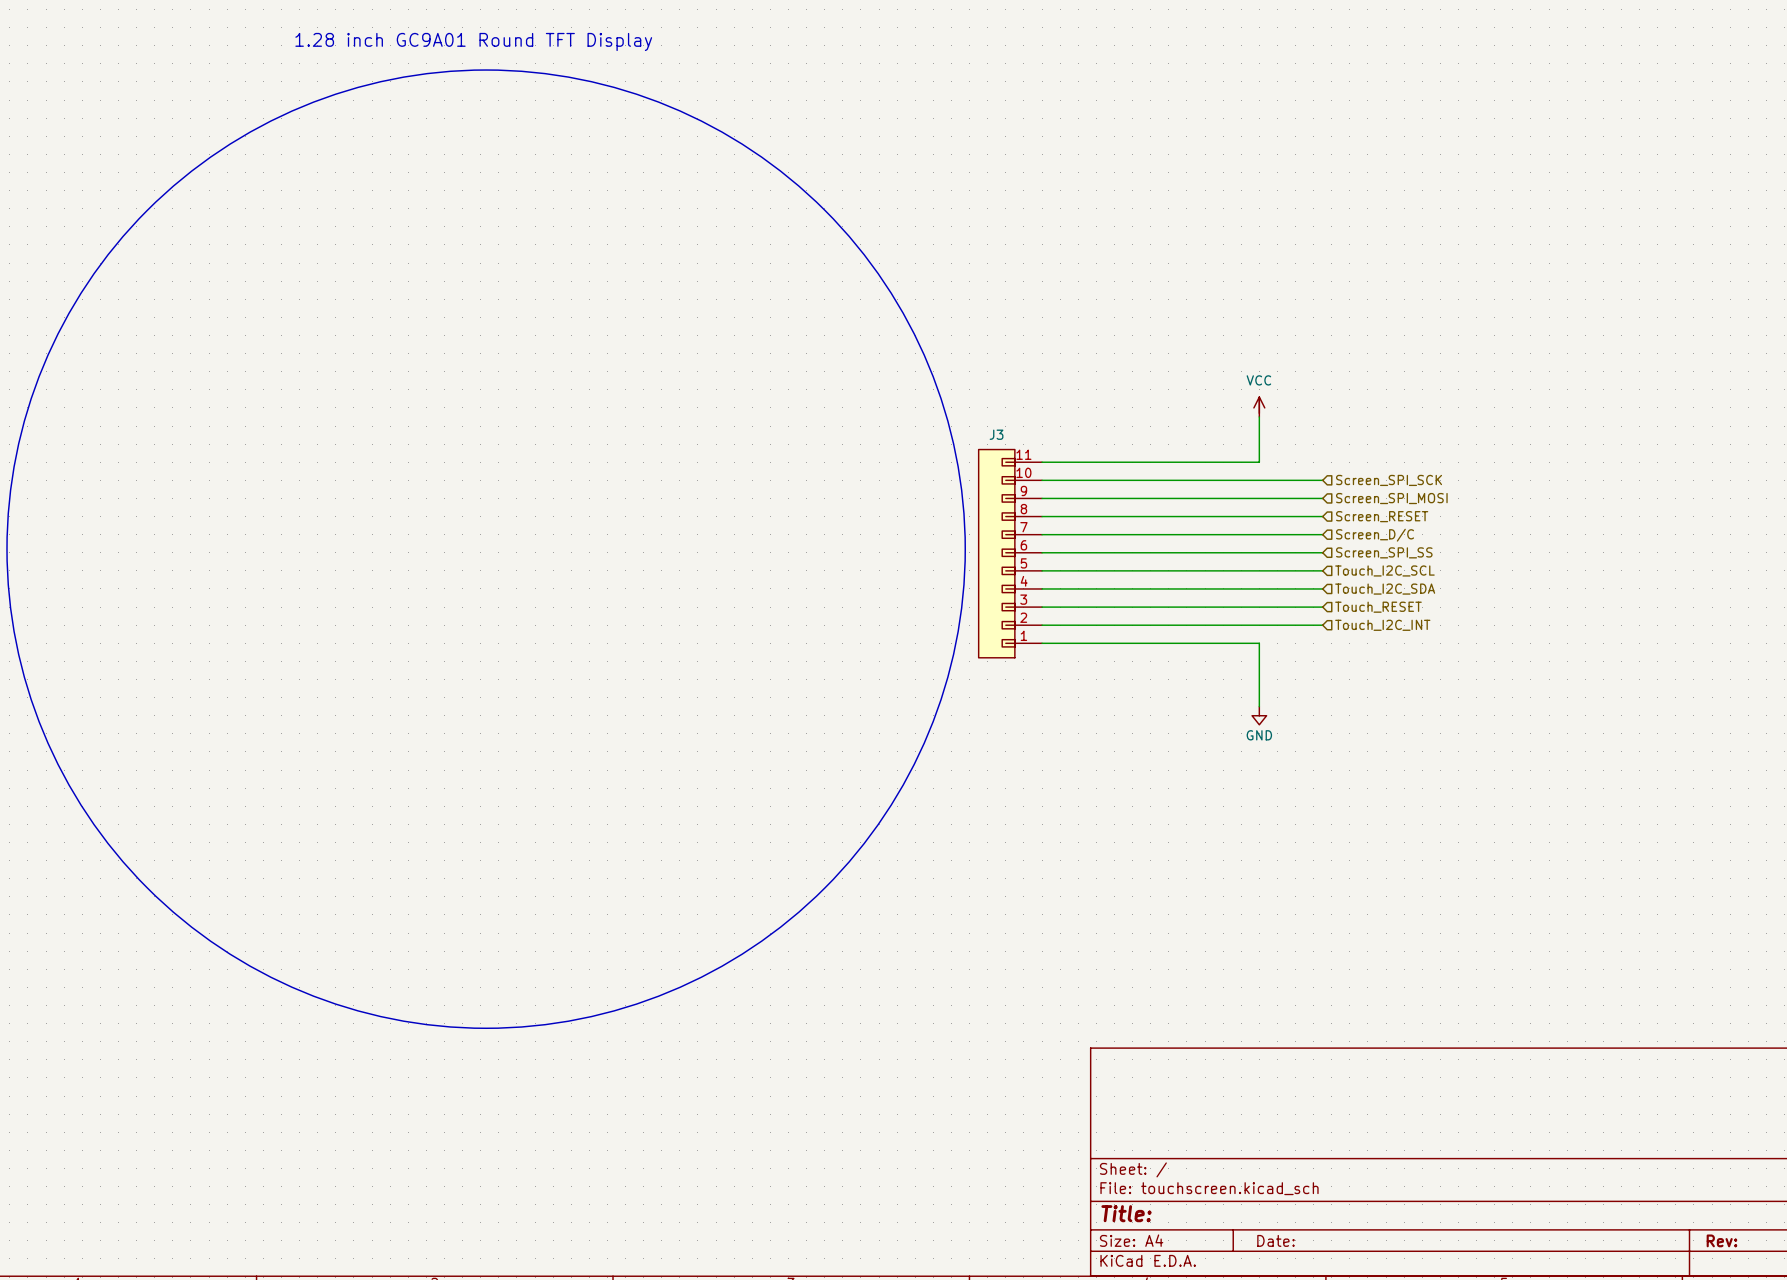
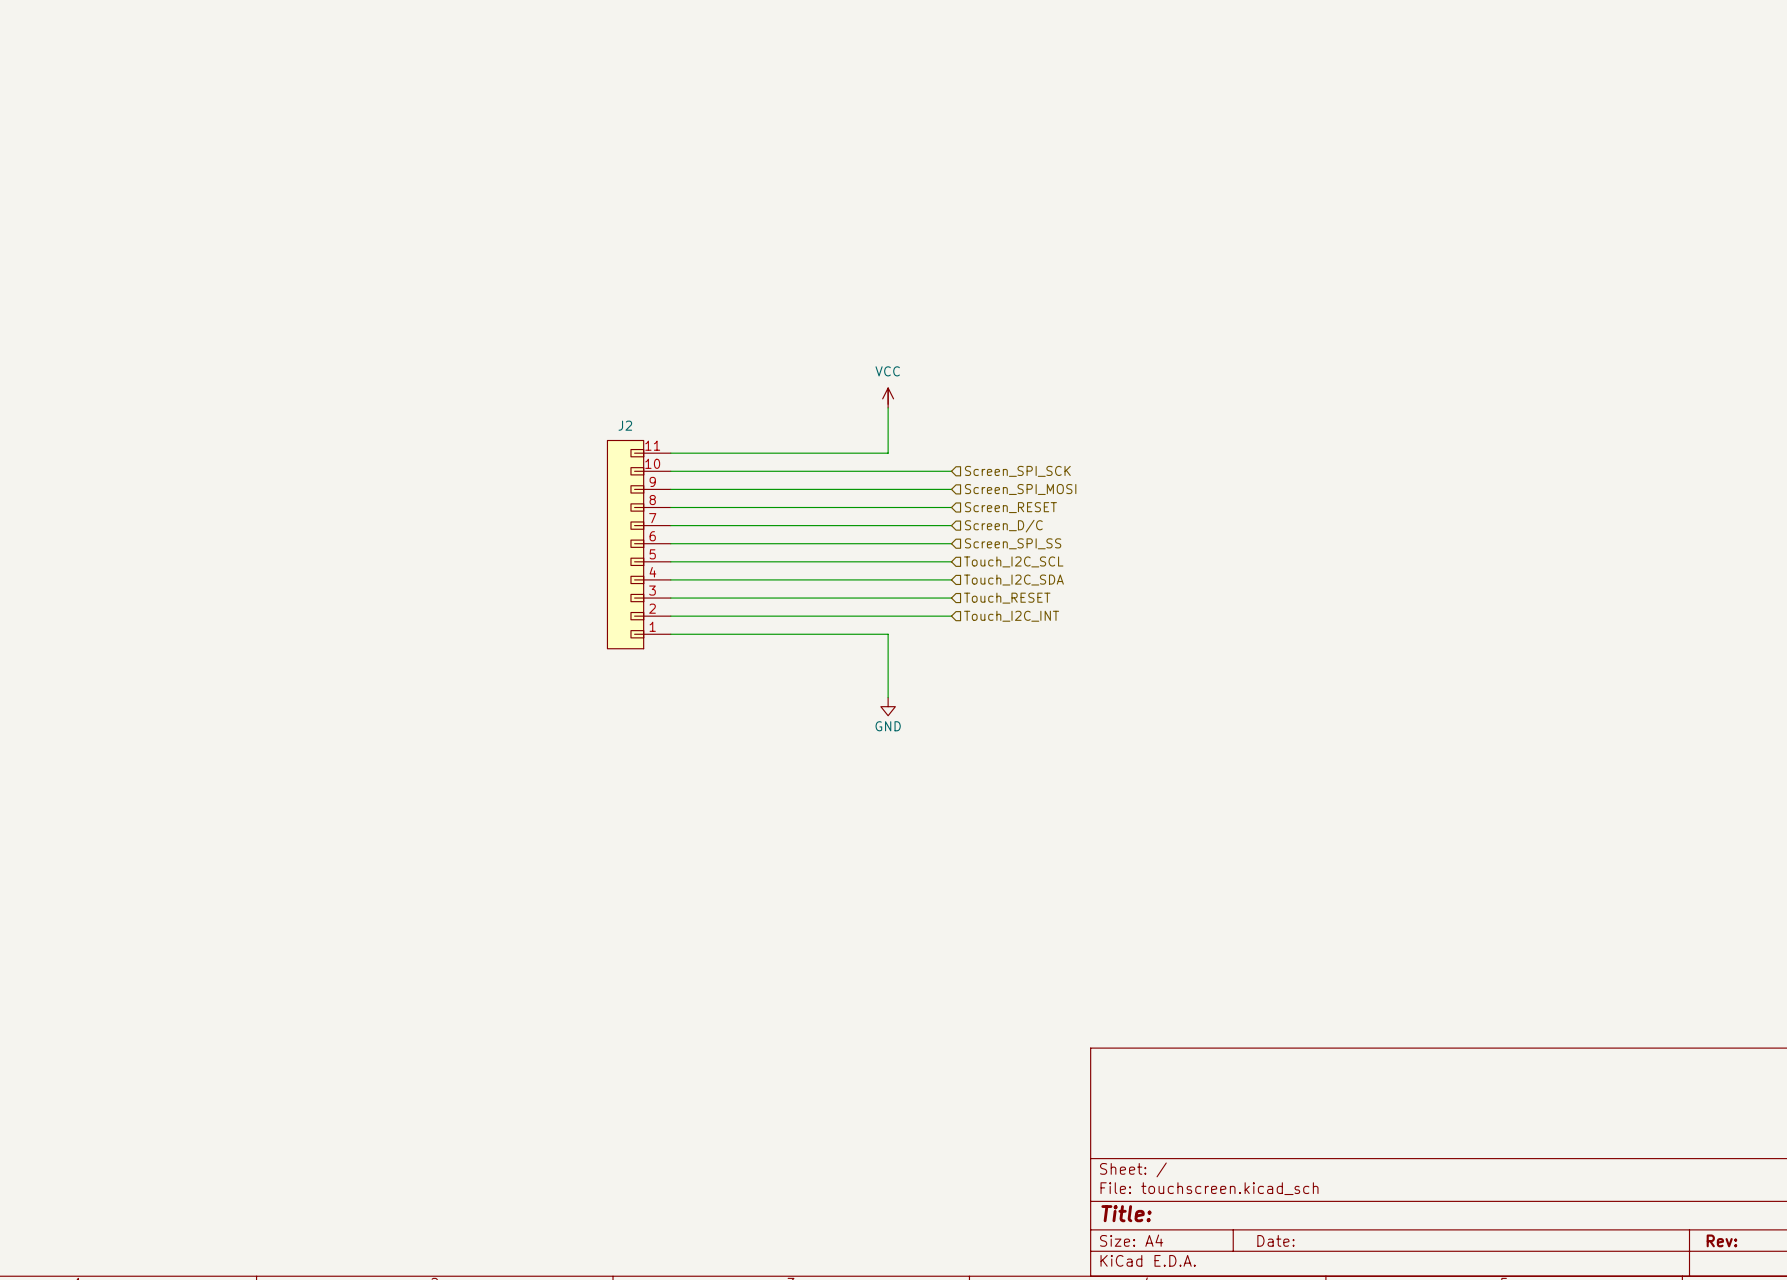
text: 1.28 inch GC9A01 Round TFT Display (473, 41) -> none
drawing: [6, 70, 966, 1029] -> none
power symbol: none -> VCC (888, 397)
wire: none -> (888, 407) (888, 453) (670, 453)
power symbol: VCC (1259, 407) -> none
wire: (1259, 416) (1259, 462) (1042, 462) -> none
wire: none -> (670, 471) (951, 471)
hierarchical label: none -> Screen_SPI_SCK (1017, 471)
wire: (1042, 480) (1322, 480) -> none
hierarchical label: Screen_SPI_SCK (1389, 480) -> none
wire: none -> (670, 489) (951, 489)
hierarchical label: none -> Screen_SPI_MOSI (1020, 489)
wire: (1042, 498) (1322, 498) -> none
hierarchical label: Screen_SPI_MOSI (1391, 498) -> none
wire: none -> (670, 507) (951, 507)
hierarchical label: none -> Screen_RESET (1010, 507)
wire: (1042, 516) (1322, 516) -> none
hierarchical label: Screen_RESET (1382, 516) -> none
wire: none -> (670, 525) (951, 525)
hierarchical label: none -> Screen_D/C (1003, 526)
wire: (1042, 534) (1322, 534) -> none
hierarchical label: Screen_D/C (1375, 535) -> none
wire: none -> (670, 543) (951, 543)
hierarchical label: none -> Screen_SPI_SS (1013, 543)
J2: none -> (639, 544)
wire: (1042, 552) (1322, 552) -> none
hierarchical label: Screen_SPI_SS (1384, 552) -> none
J3: (1010, 553) -> none
wire: none -> (670, 561) (951, 561)
hierarchical label: none -> Touch_I2C_SCL (1013, 561)
wire: (1042, 570) (1322, 570) -> none
hierarchical label: Touch_I2C_SCL (1384, 570) -> none
wire: none -> (670, 579) (951, 579)
hierarchical label: none -> Touch_I2C_SDA (1013, 580)
wire: (1042, 588) (1322, 588) -> none
hierarchical label: Touch_I2C_SDA (1385, 589) -> none
wire: none -> (670, 598) (951, 598)
hierarchical label: none -> Touch_RESET (1007, 598)
wire: (1042, 607) (1322, 607) -> none
hierarchical label: Touch_RESET (1378, 607) -> none
wire: none -> (670, 616) (951, 616)
hierarchical label: none -> Touch_I2C_INT (1011, 616)
wire: (1042, 625) (1322, 625) -> none
hierarchical label: Touch_I2C_INT (1382, 625) -> none
wire: none -> (670, 634) (888, 634) (888, 697)
wire: (1042, 643) (1259, 643) (1259, 706) -> none
power symbol: none -> GND (888, 706)
power symbol: GND (1259, 715) -> none

